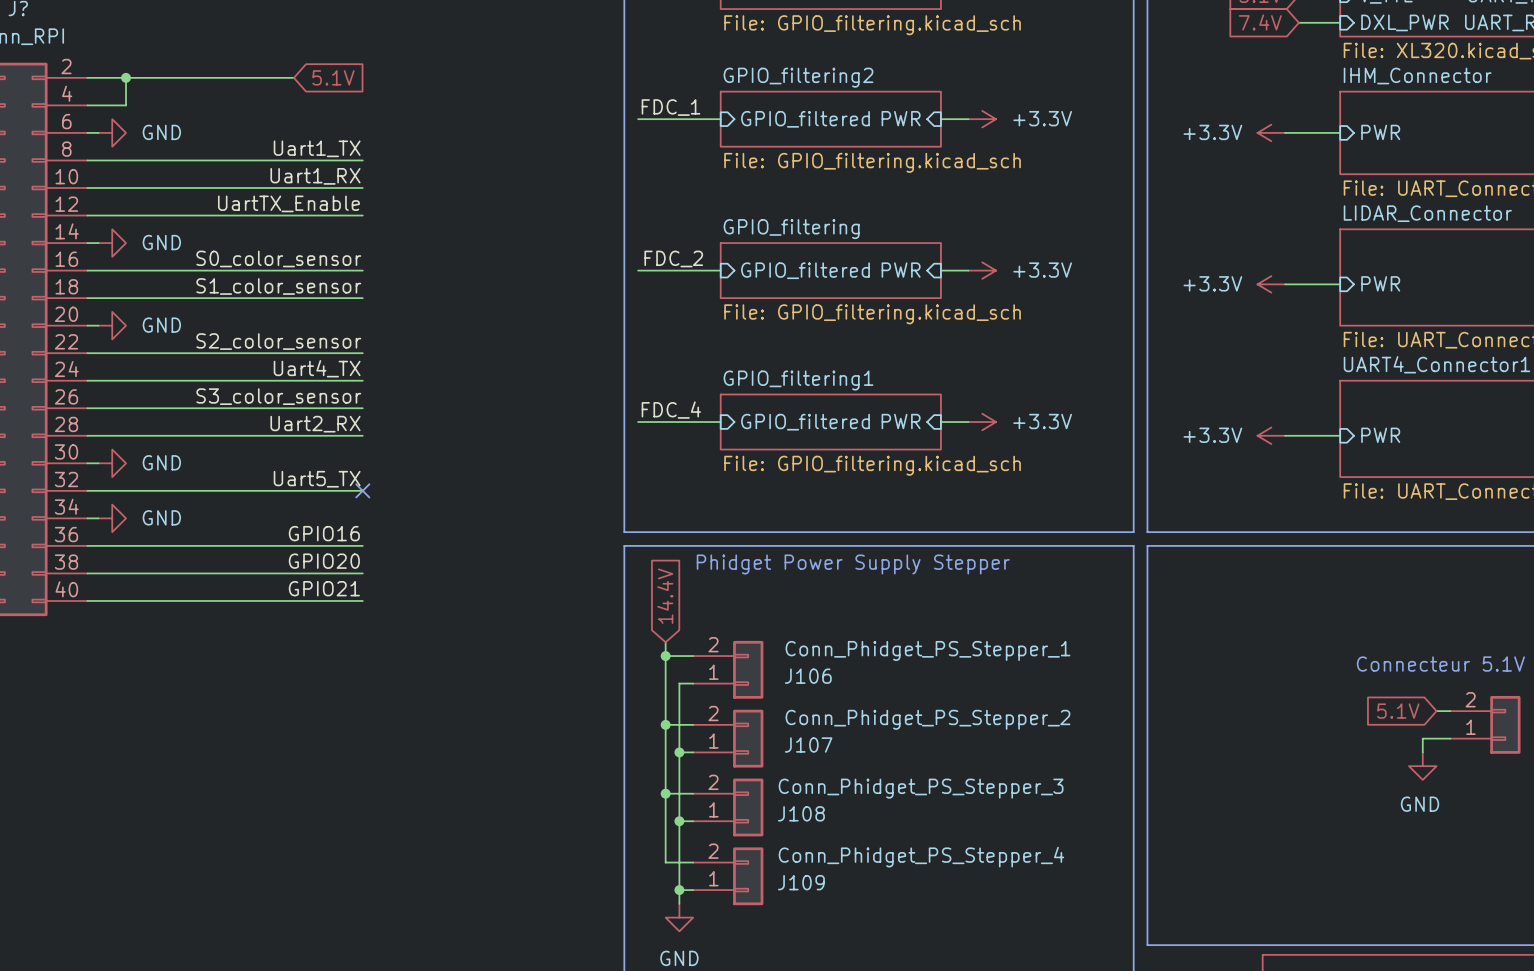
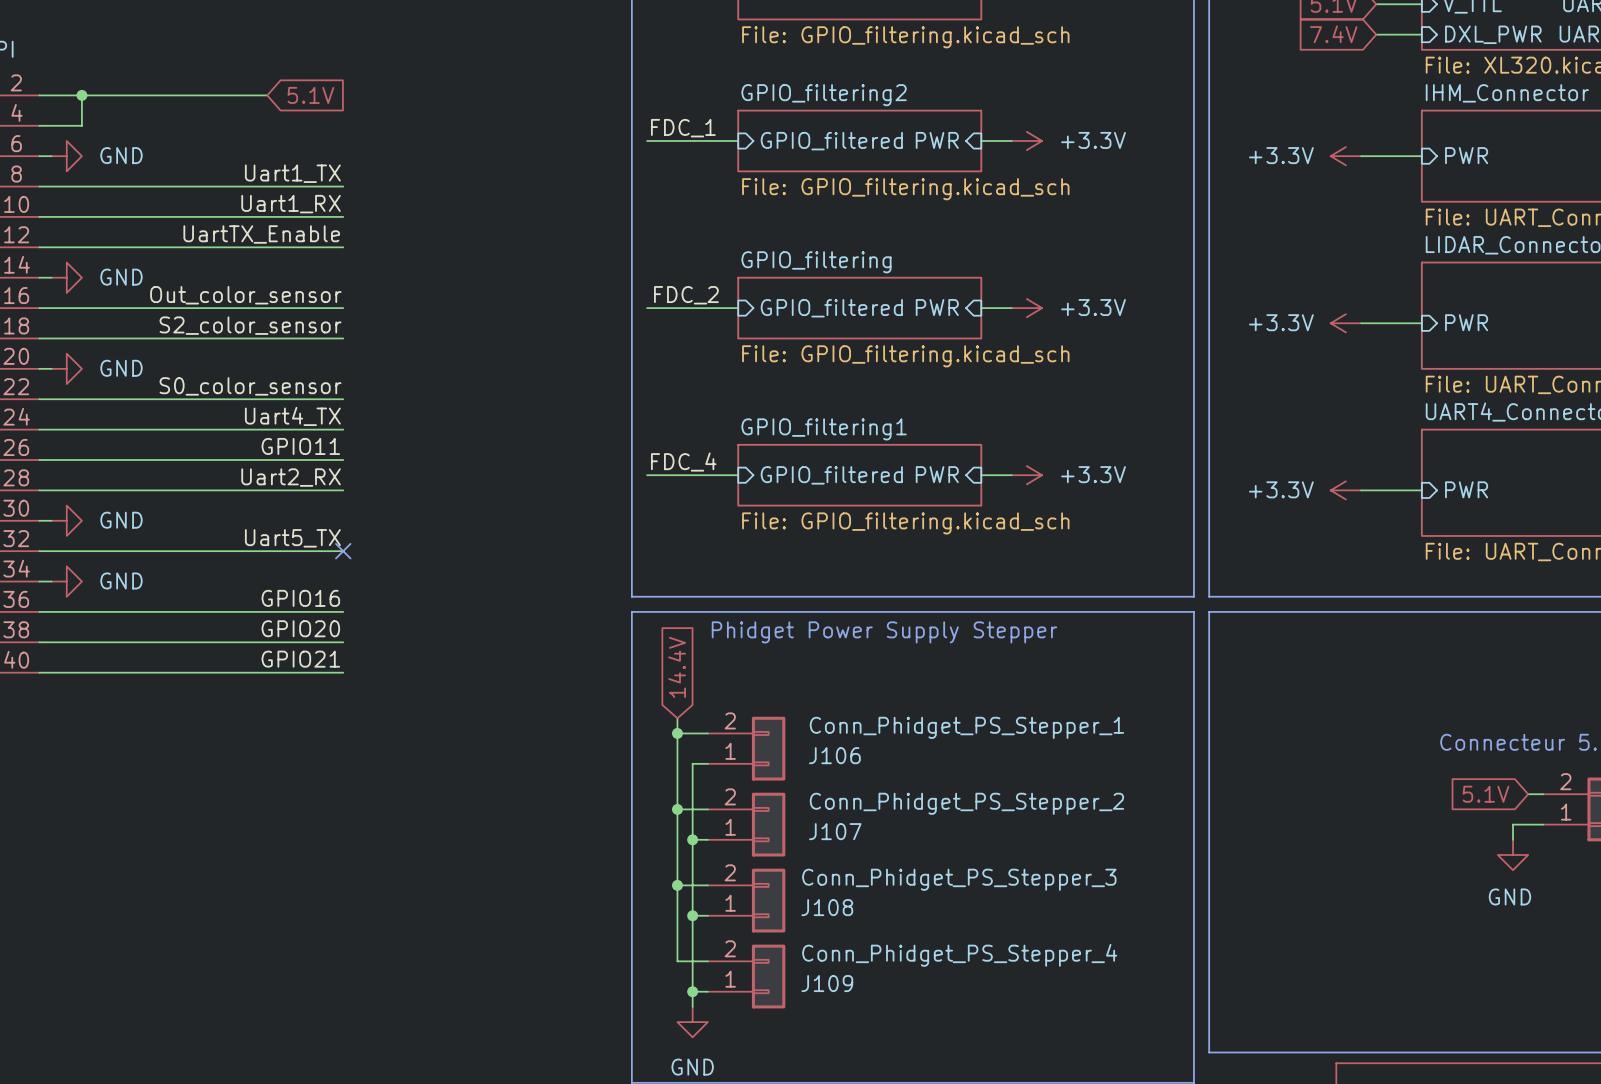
label: S0_color_sensor (278, 258) -> Out_color_sensor (245, 295)
label: S1_color_sensor (278, 286) -> S2_color_sensor (250, 325)
label: S2_color_sensor (278, 341) -> S0_color_sensor (250, 386)
label: S3_color_sensor (278, 396) -> GPIO11 (300, 446)

